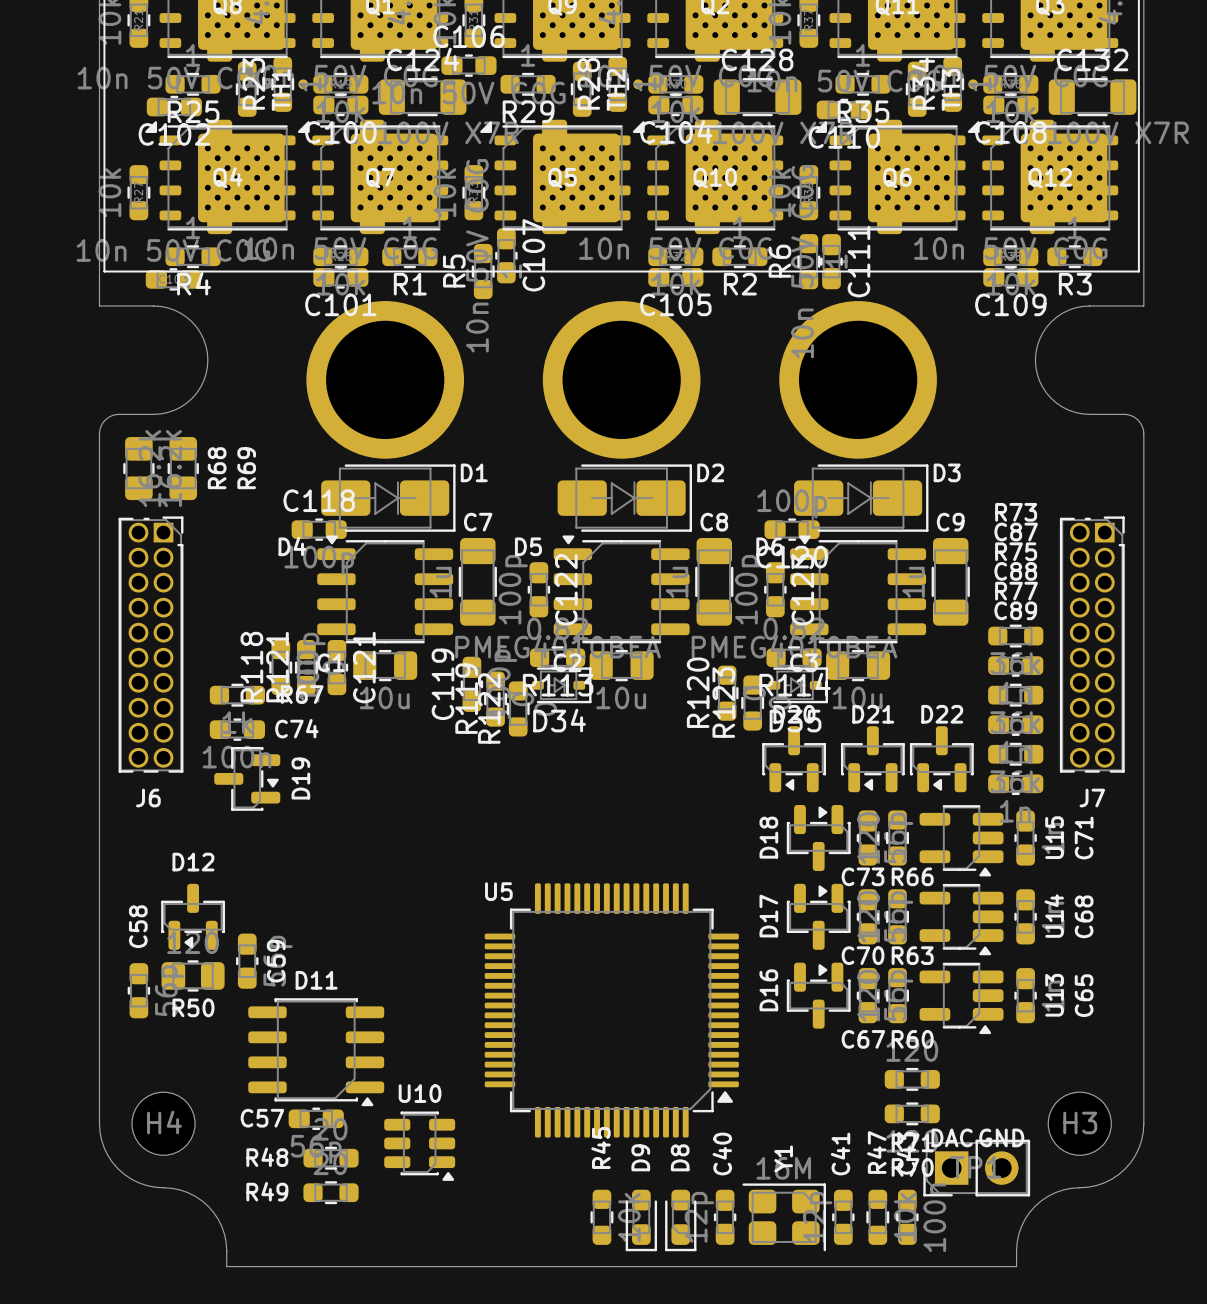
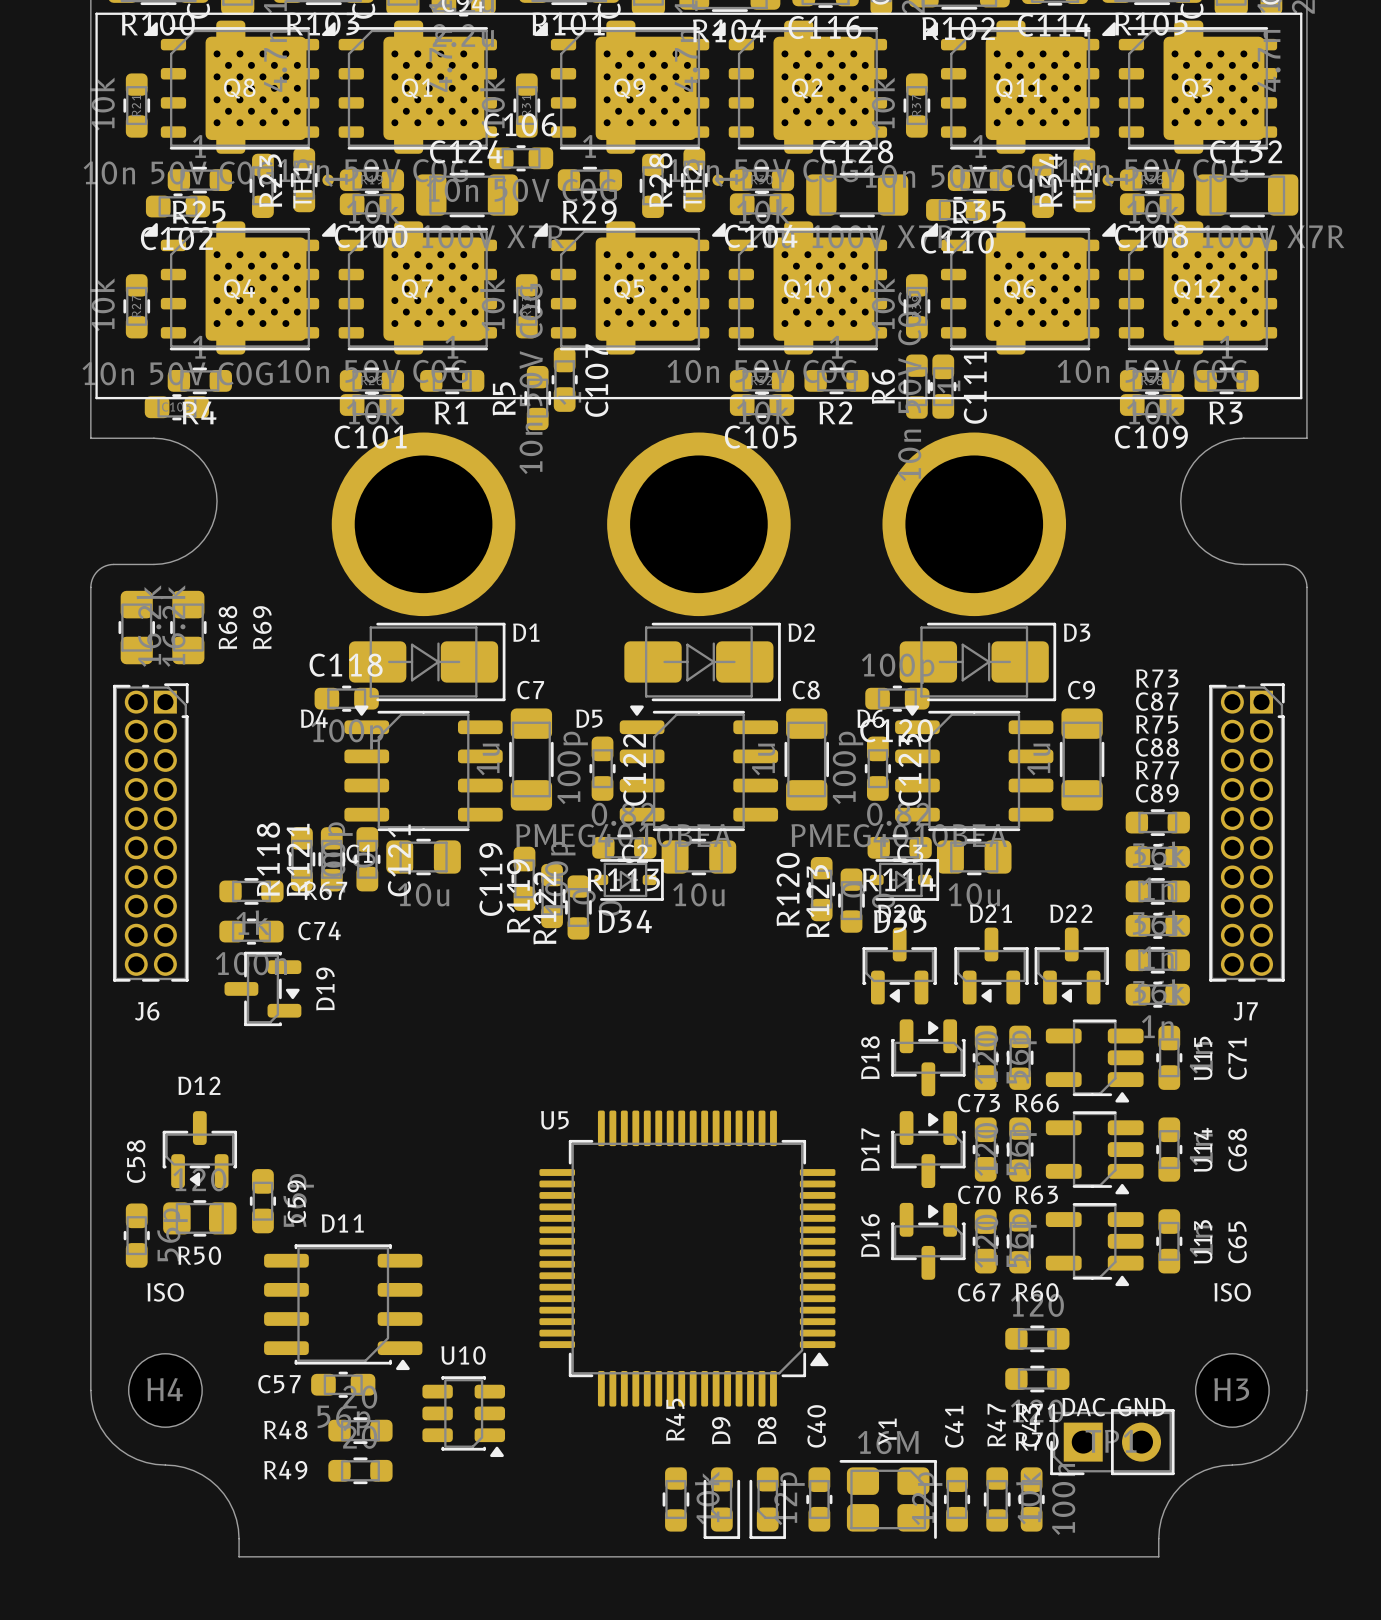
text: none -> ISO (165, 1292)
text: none -> ISO (1232, 1292)

